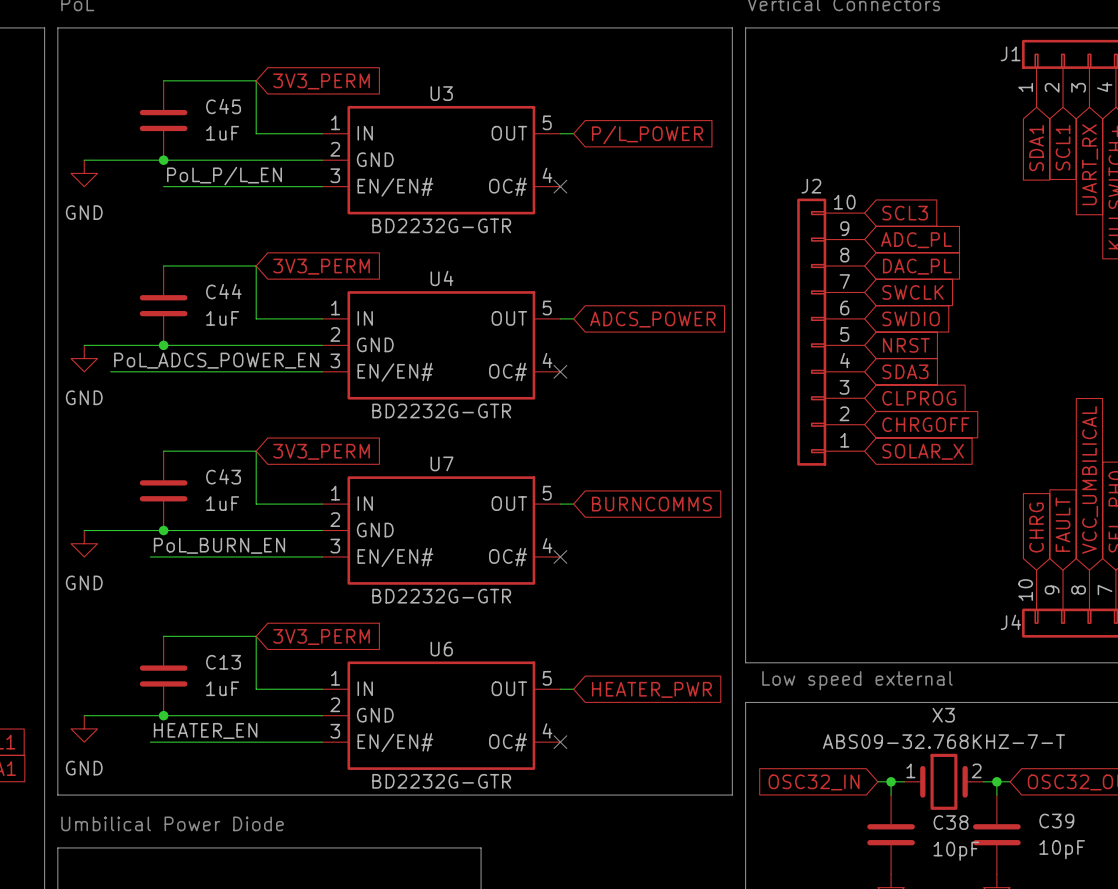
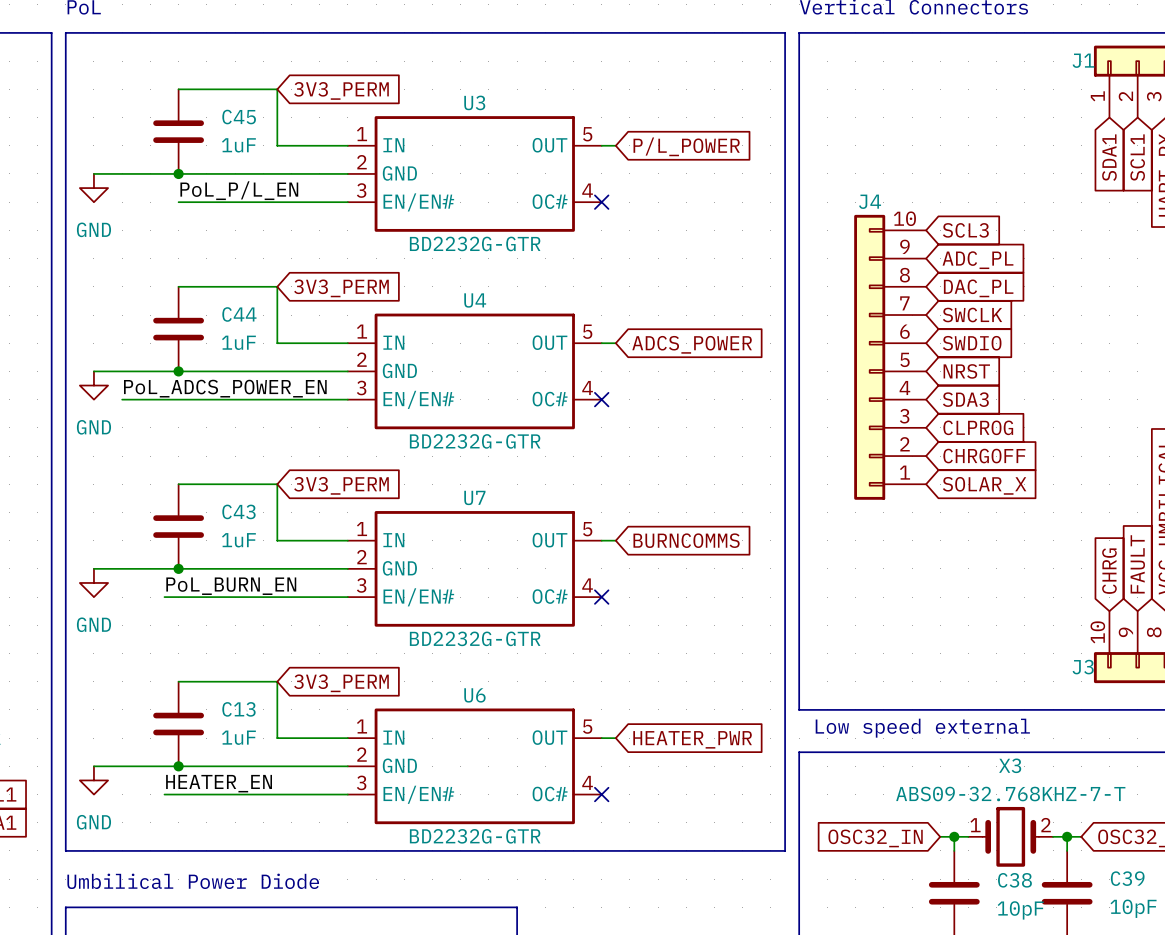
J2 name: J2 (811, 186) -> J4 (870, 201)
J4 name: J4 (1010, 622) -> J3 (1083, 667)

